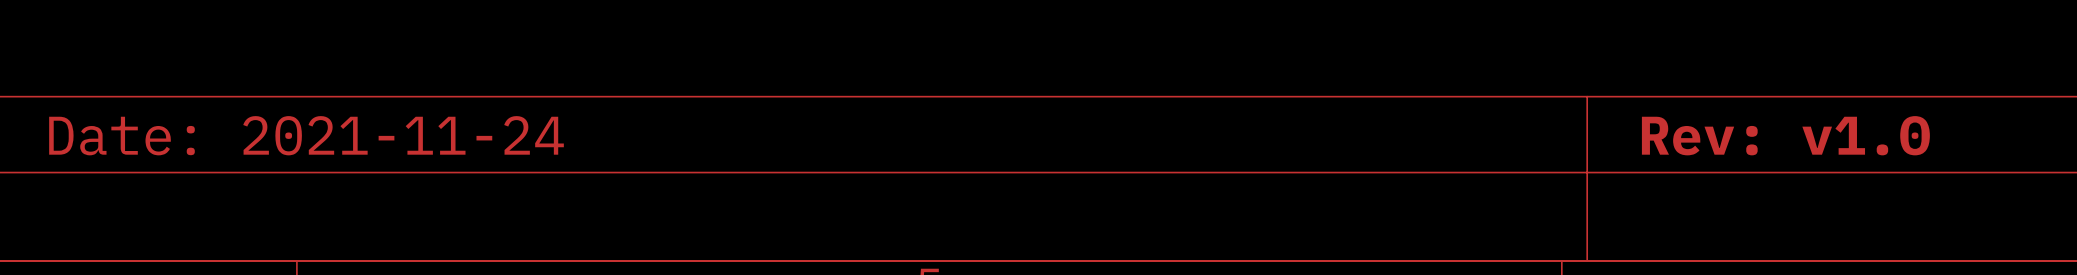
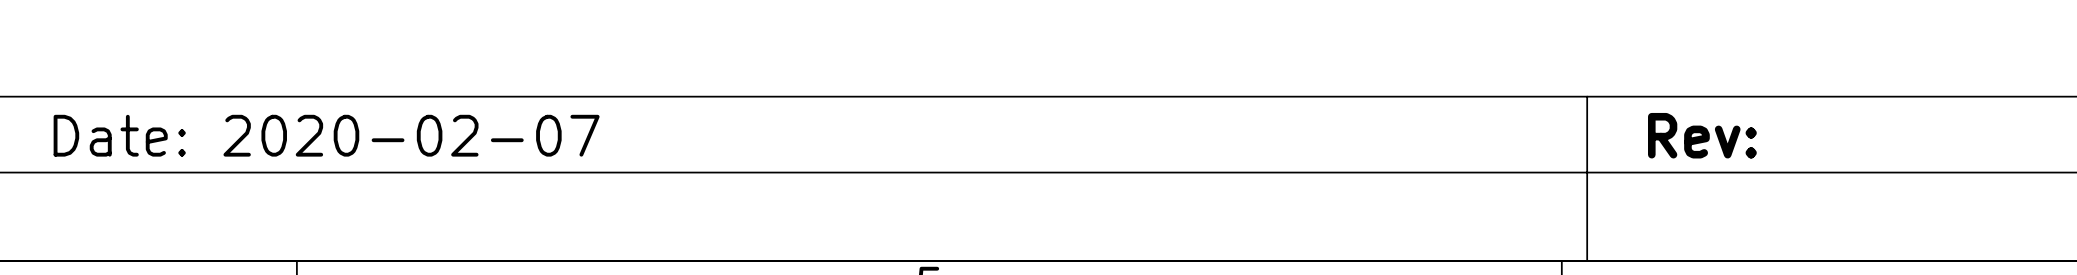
title block: Date: 2021-11-24 (306, 135) -> Date: 2020-02-07 (326, 135)
title block: Rev: v1.0 (1785, 135) -> Rev: (1702, 135)

